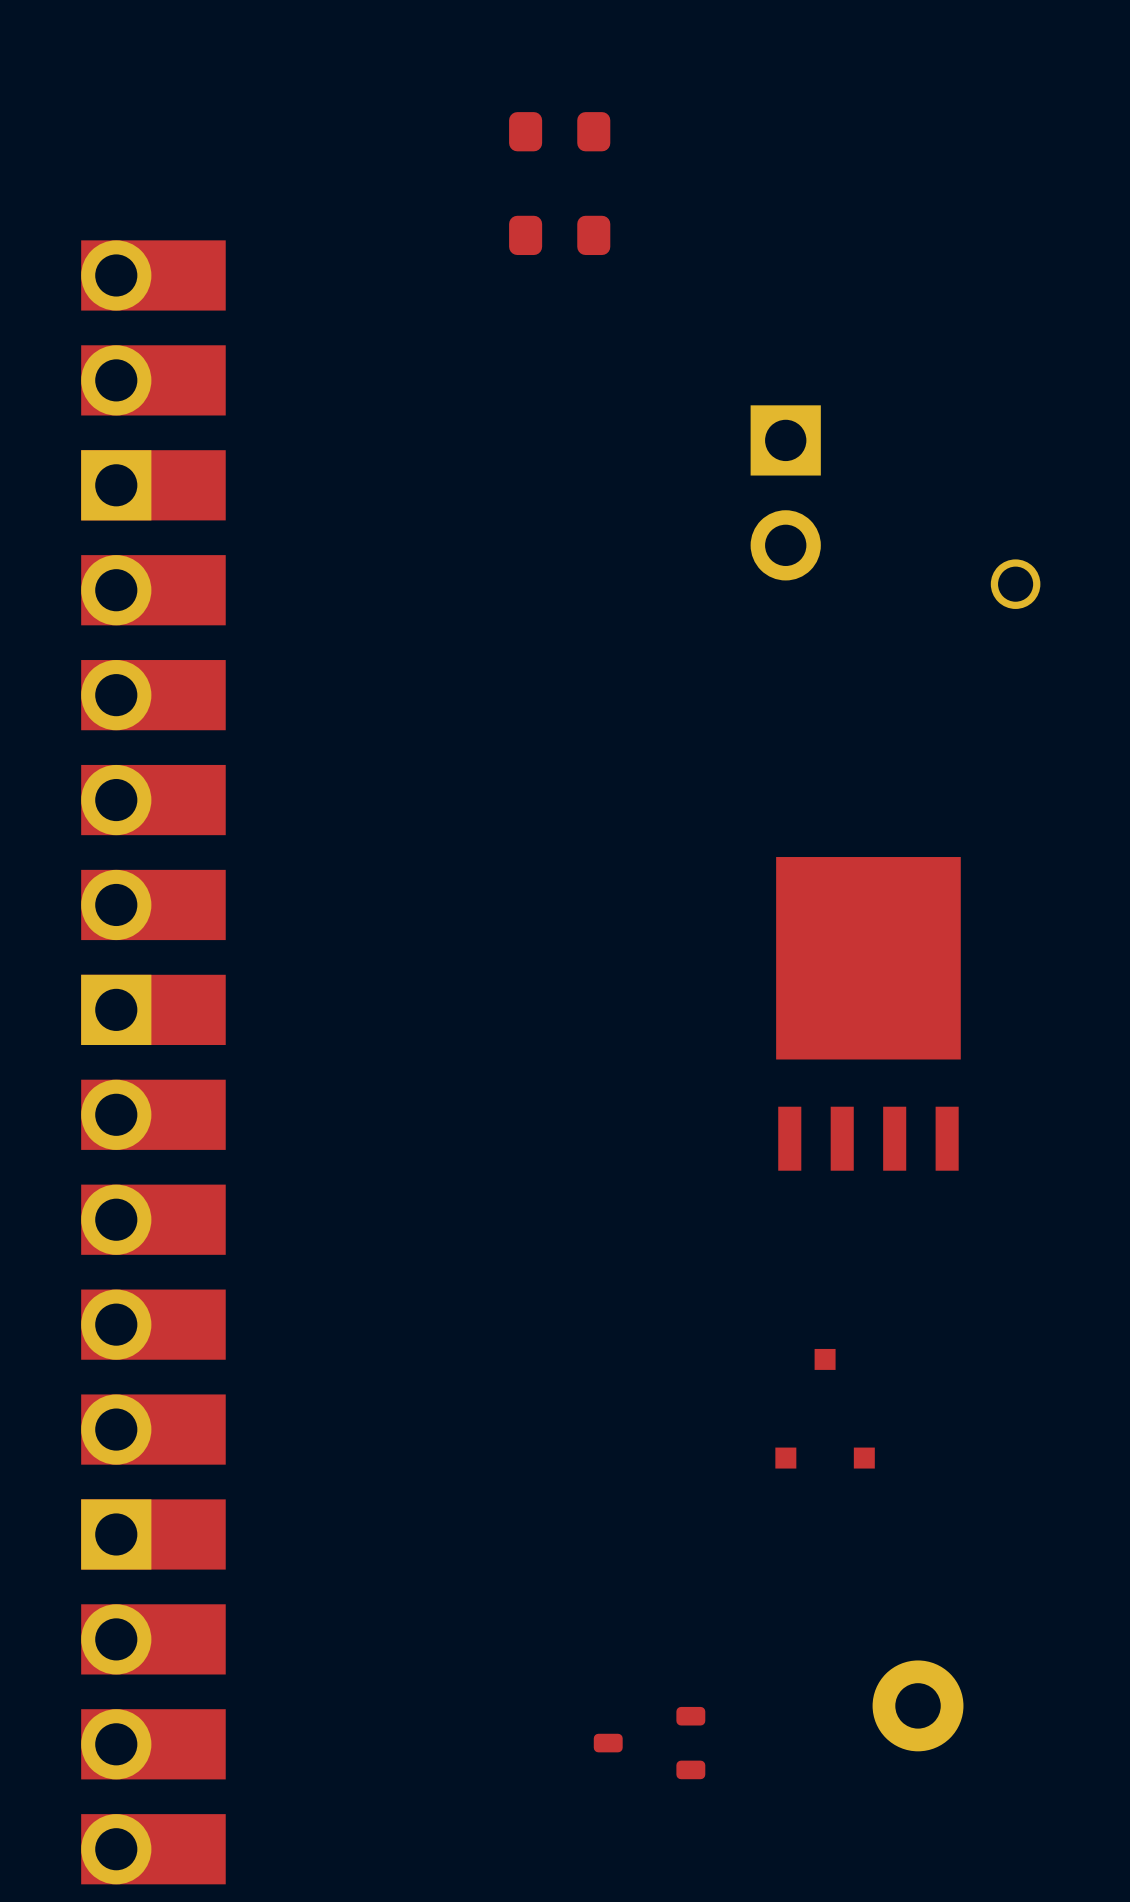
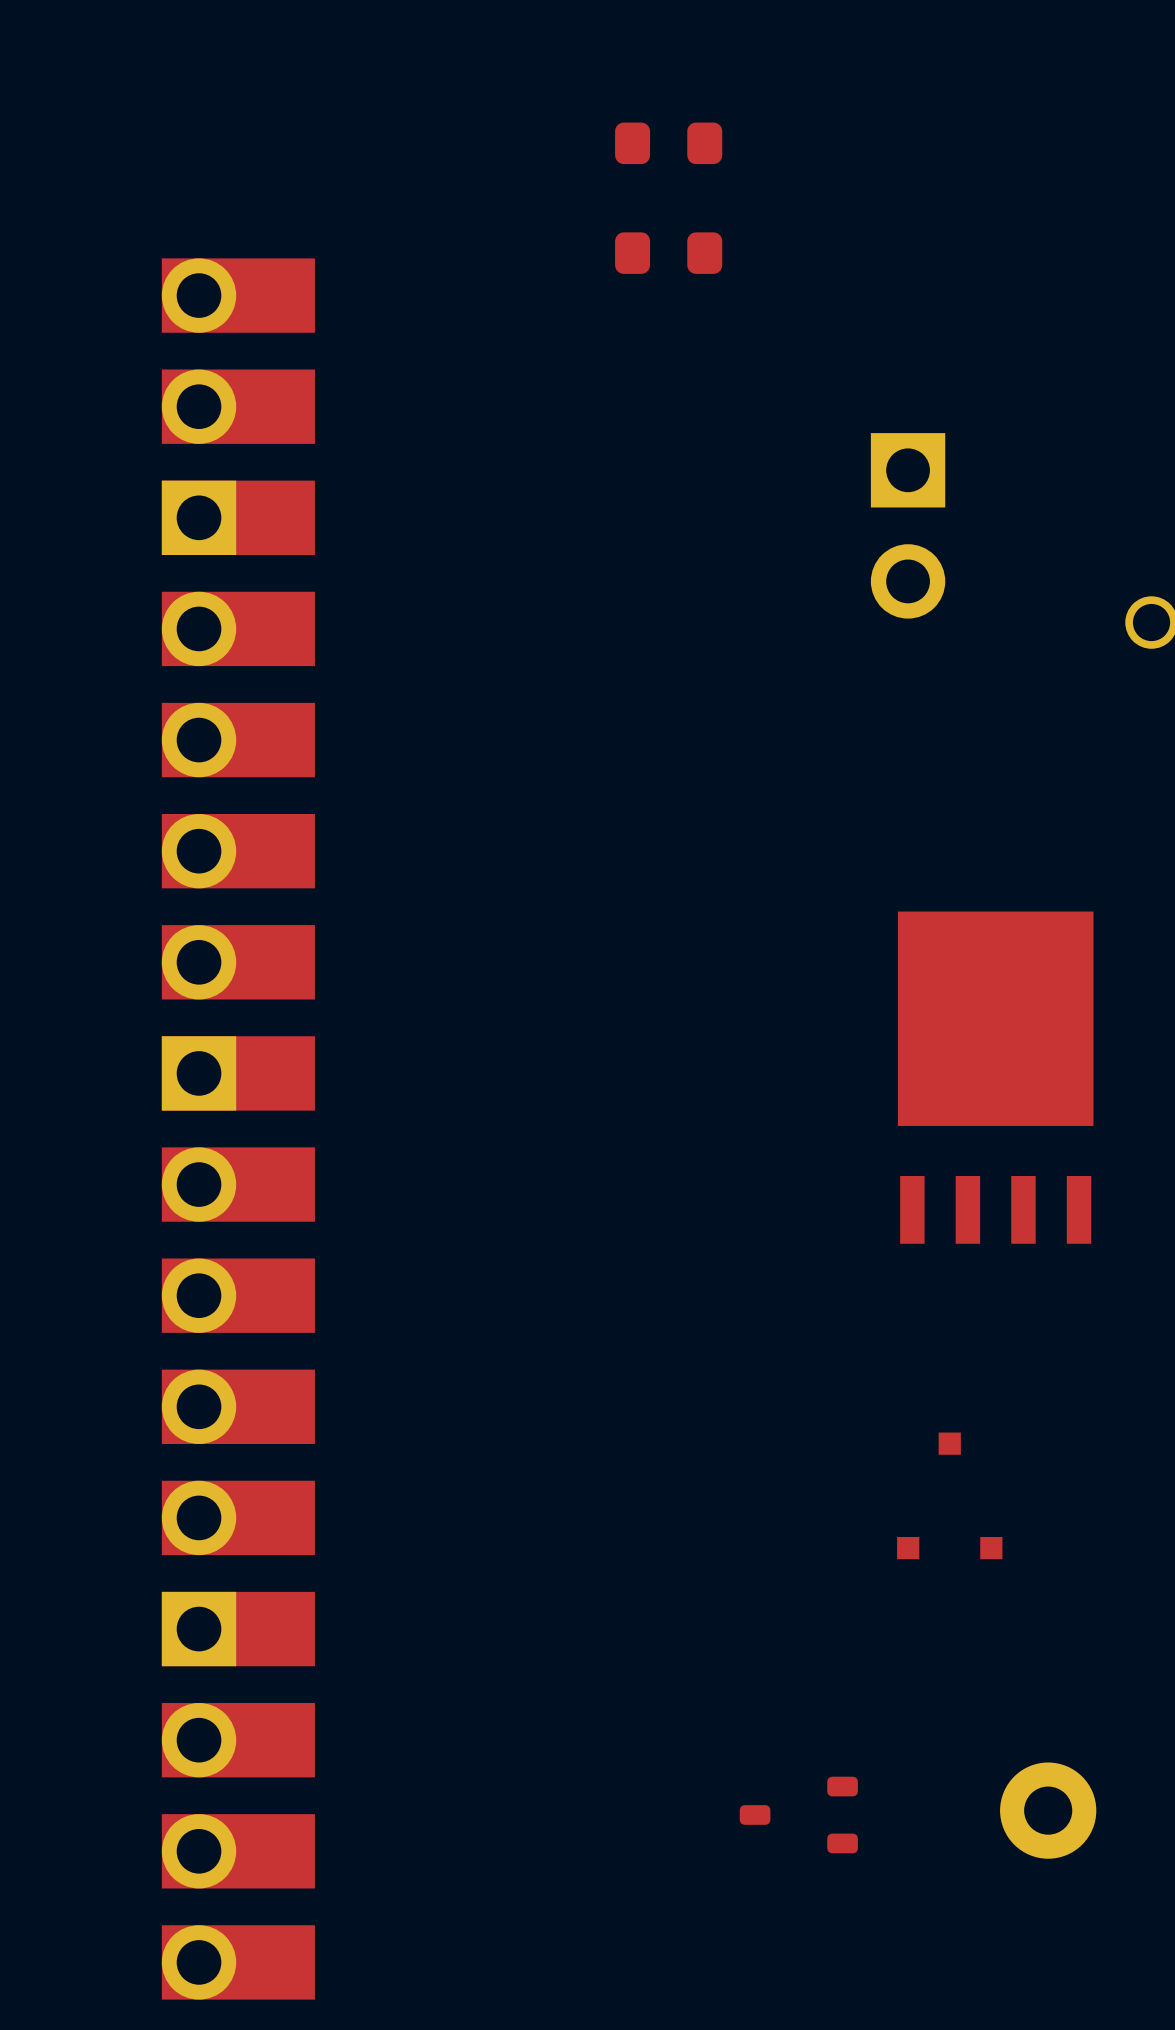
part position: (649, 1743) -> (798, 1814)

